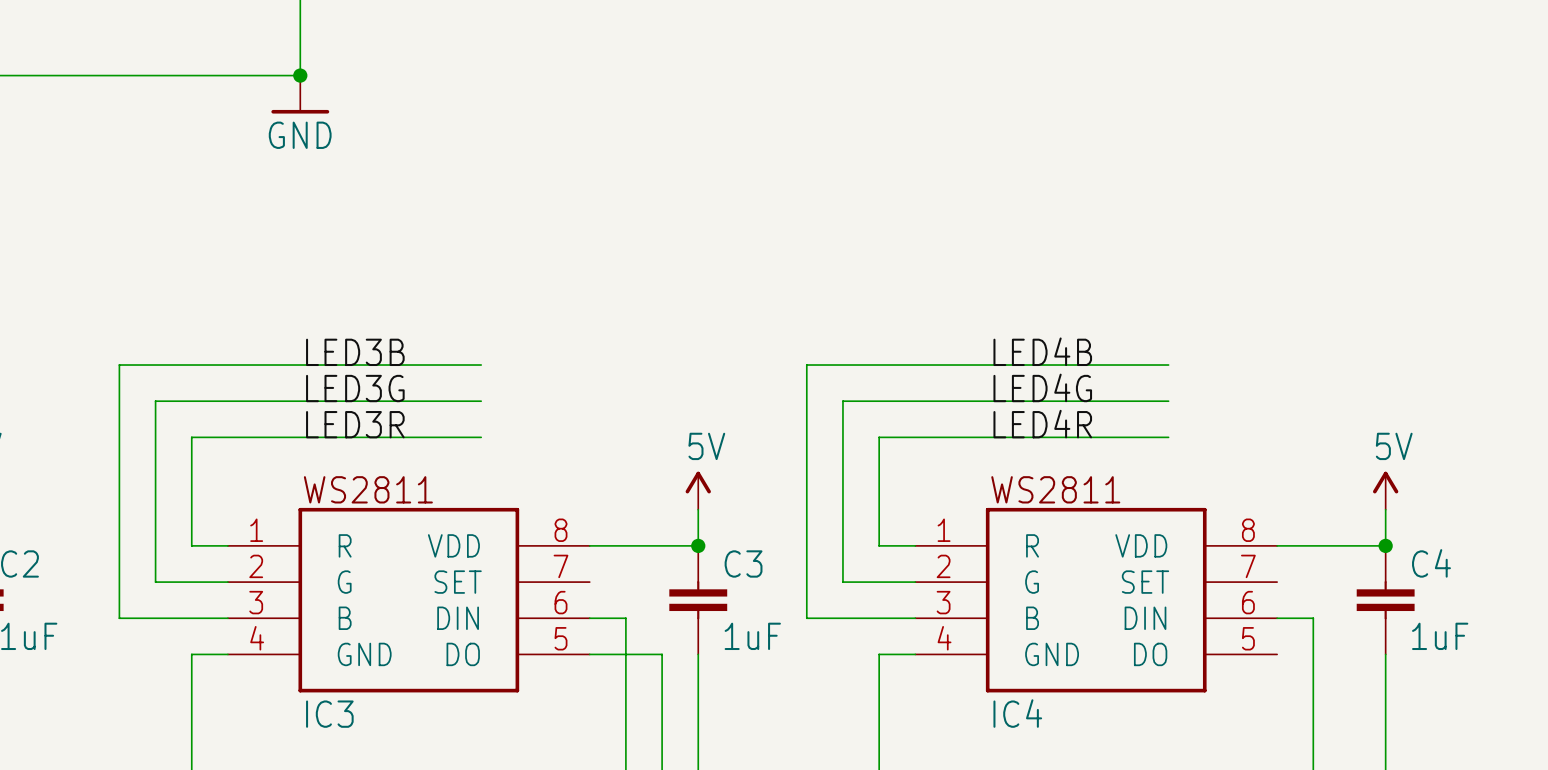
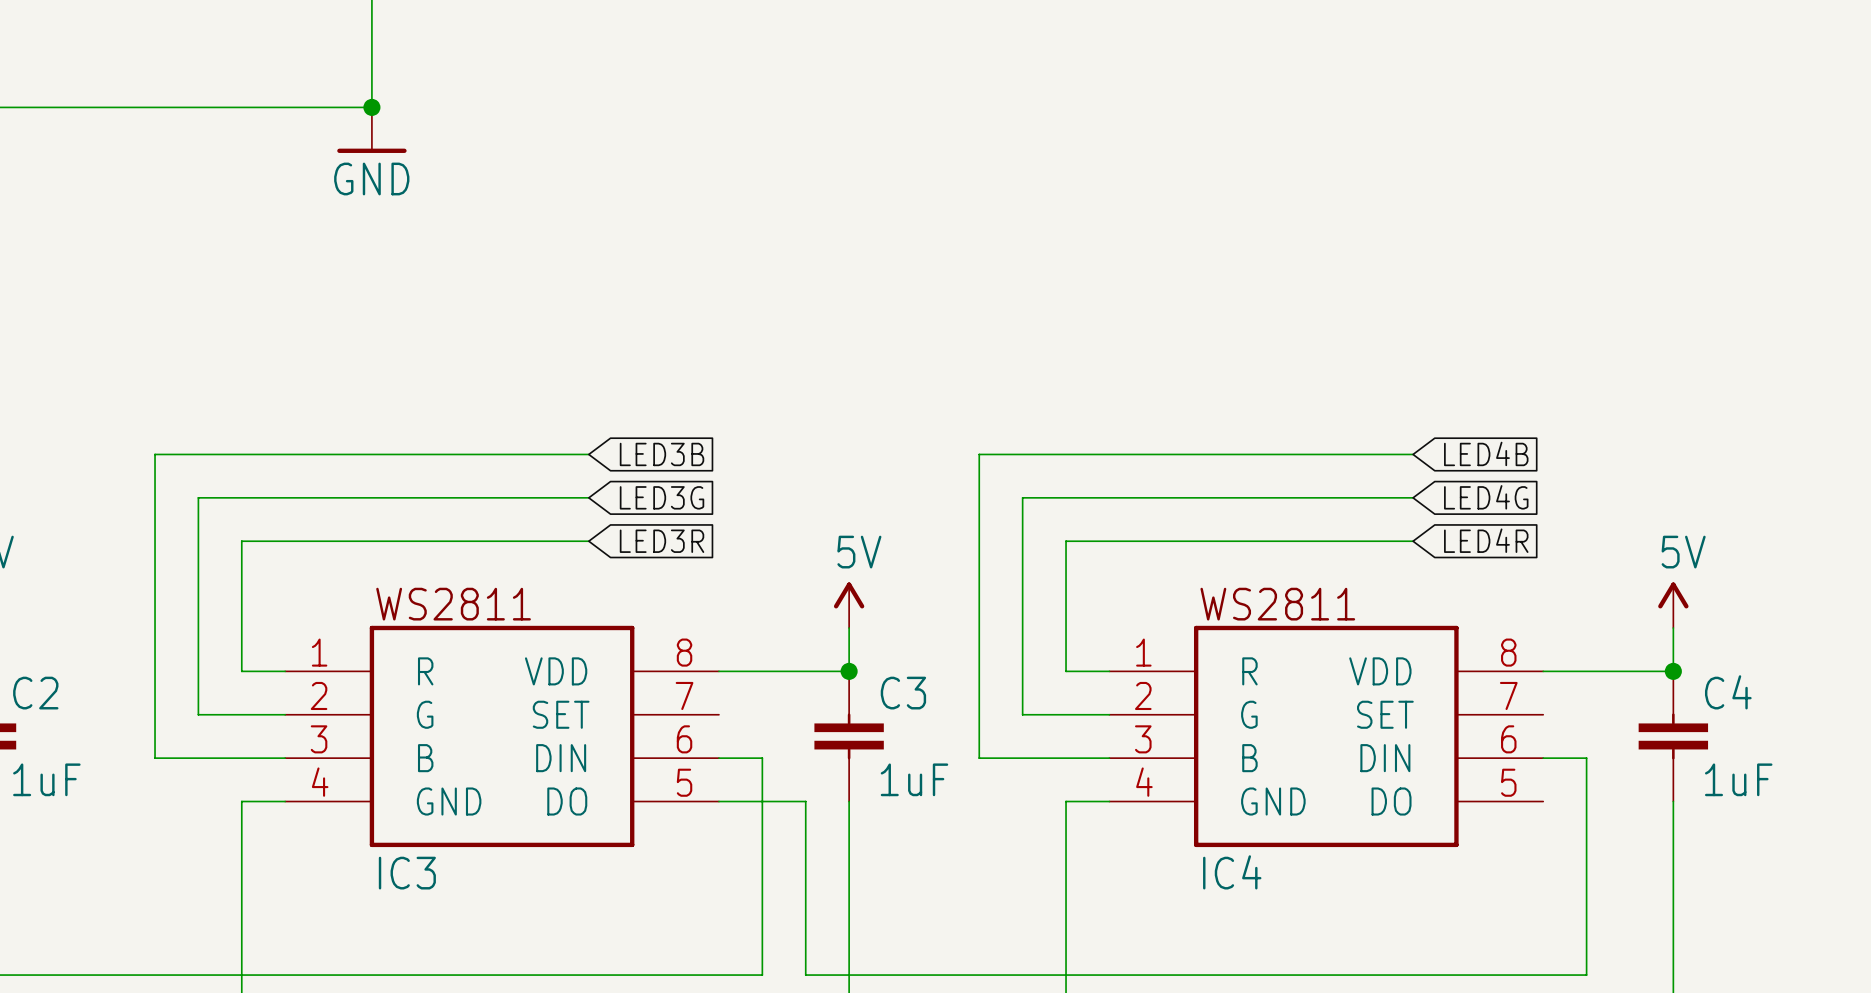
label: LED4B (1042, 351) -> none
label: LED3B (355, 352) -> none
global label: none -> LED4B (1486, 453)
global label: none -> LED3B (662, 454)
label: LED4G (1042, 387) -> none
label: LED3G (355, 388) -> none
global label: none -> LED4G (1486, 497)
global label: none -> LED3G (662, 497)
label: LED3R (355, 424) -> none
label: LED4R (1042, 424) -> none
global label: none -> LED4R (1486, 540)
global label: none -> LED3R (662, 541)

